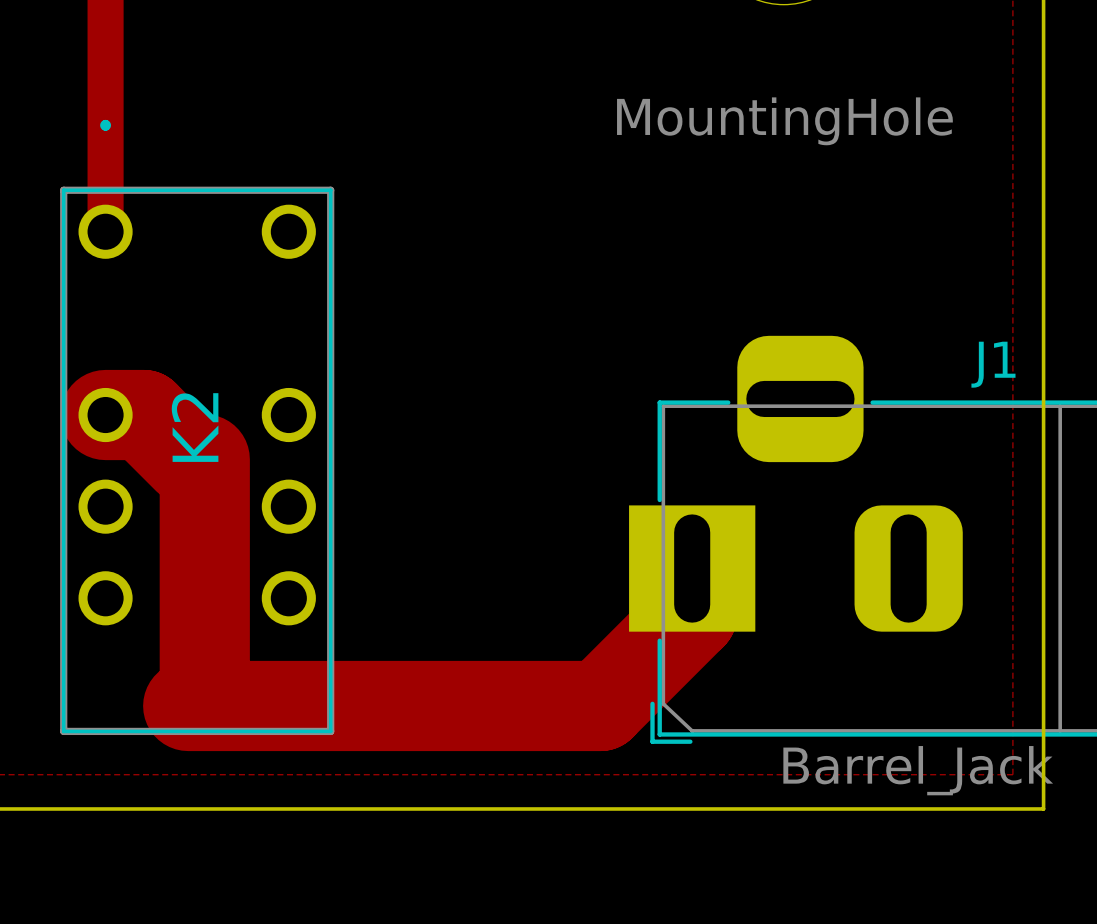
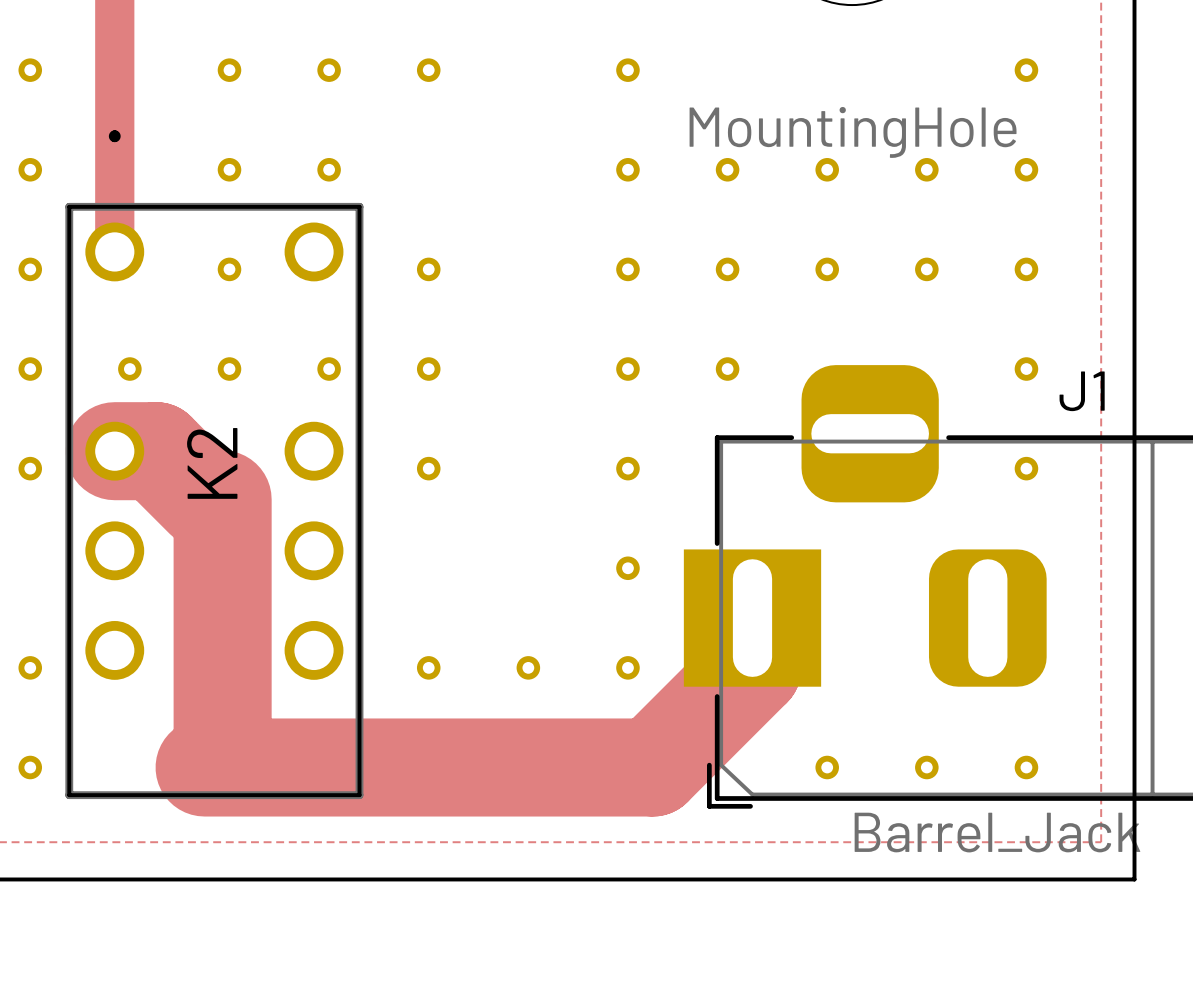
part: none -> (30, 70)
part: none -> (229, 70)
part: none -> (329, 70)
part: none -> (428, 70)
part: none -> (627, 70)
part: none -> (1026, 70)
part: none -> (30, 169)
part: none -> (229, 169)
part: none -> (329, 169)
part: none -> (627, 169)
part: none -> (727, 169)
part: none -> (827, 169)
part: none -> (926, 169)
part: none -> (1026, 169)
part: none -> (30, 269)
part: none -> (229, 269)
part: none -> (428, 269)
part: none -> (627, 269)
part: none -> (727, 269)
part: none -> (827, 269)
part: none -> (926, 269)
part: none -> (1026, 269)
part: none -> (30, 369)
part: none -> (129, 369)
part: none -> (229, 369)
part: none -> (329, 369)
part: none -> (428, 369)
part: none -> (627, 369)
part: none -> (727, 369)
part: none -> (1026, 369)
part: none -> (30, 468)
part: none -> (428, 468)
part: none -> (627, 468)
part: none -> (1026, 468)
part: none -> (627, 568)
part: none -> (30, 667)
part: none -> (428, 667)
part: none -> (528, 667)
part: none -> (627, 667)
part: none -> (30, 767)
part: none -> (827, 767)
part: none -> (926, 767)
part: none -> (1026, 767)

